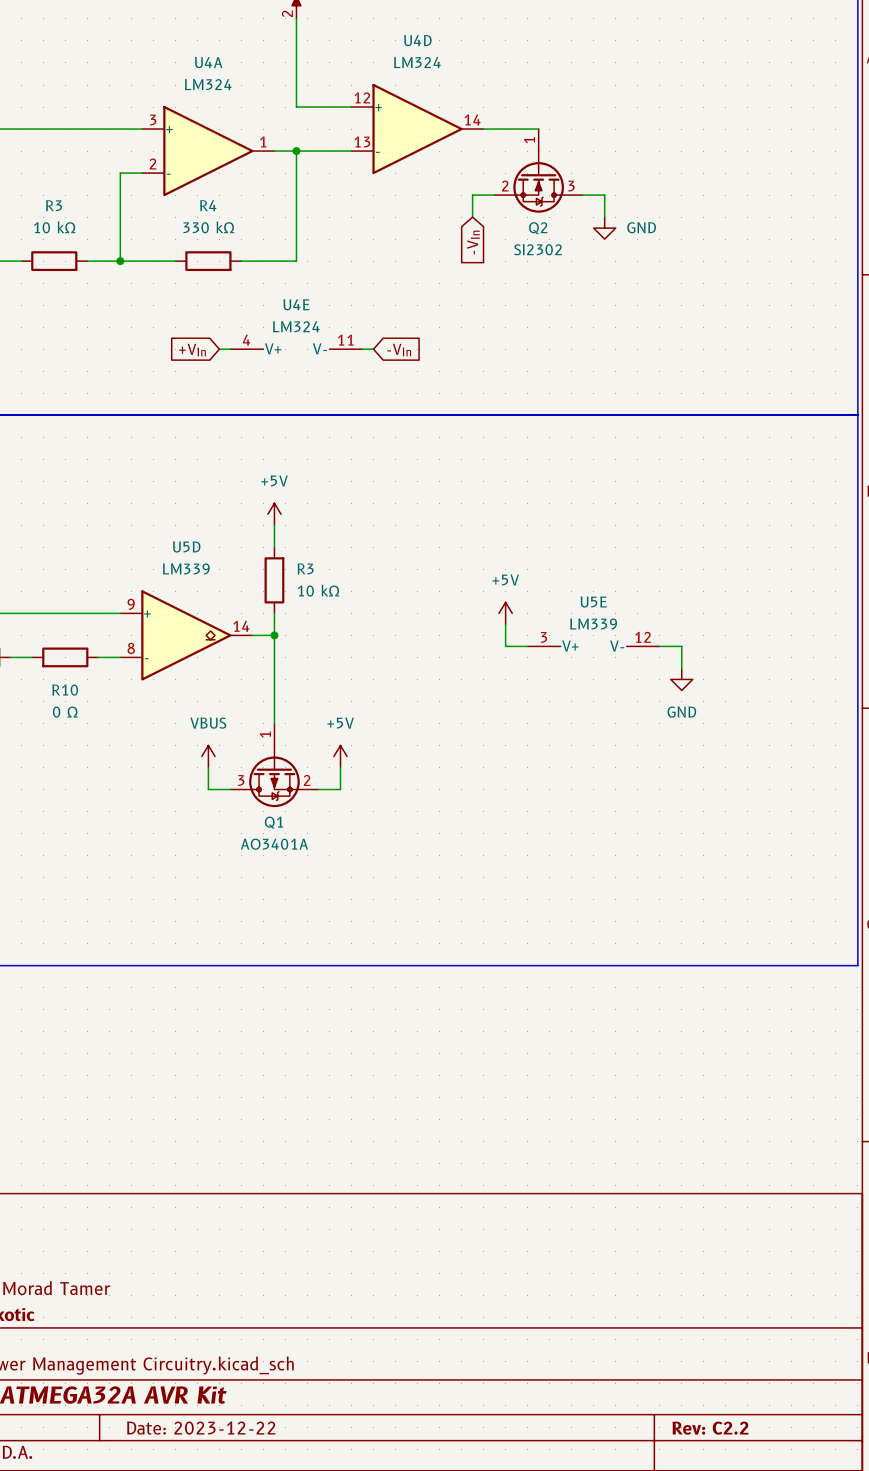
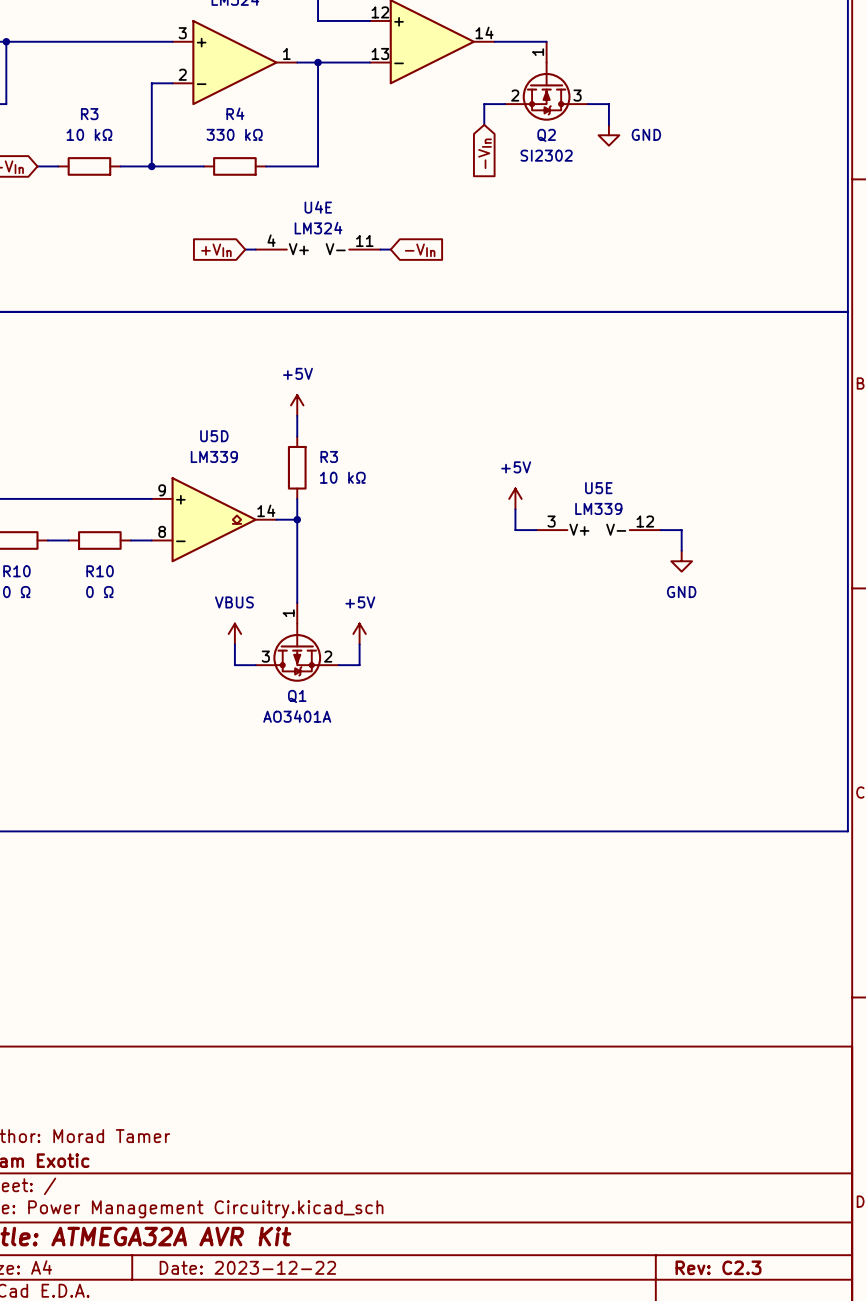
title block: Rev: C2.2 (710, 1428) -> Rev: C2.3 (718, 1267)

